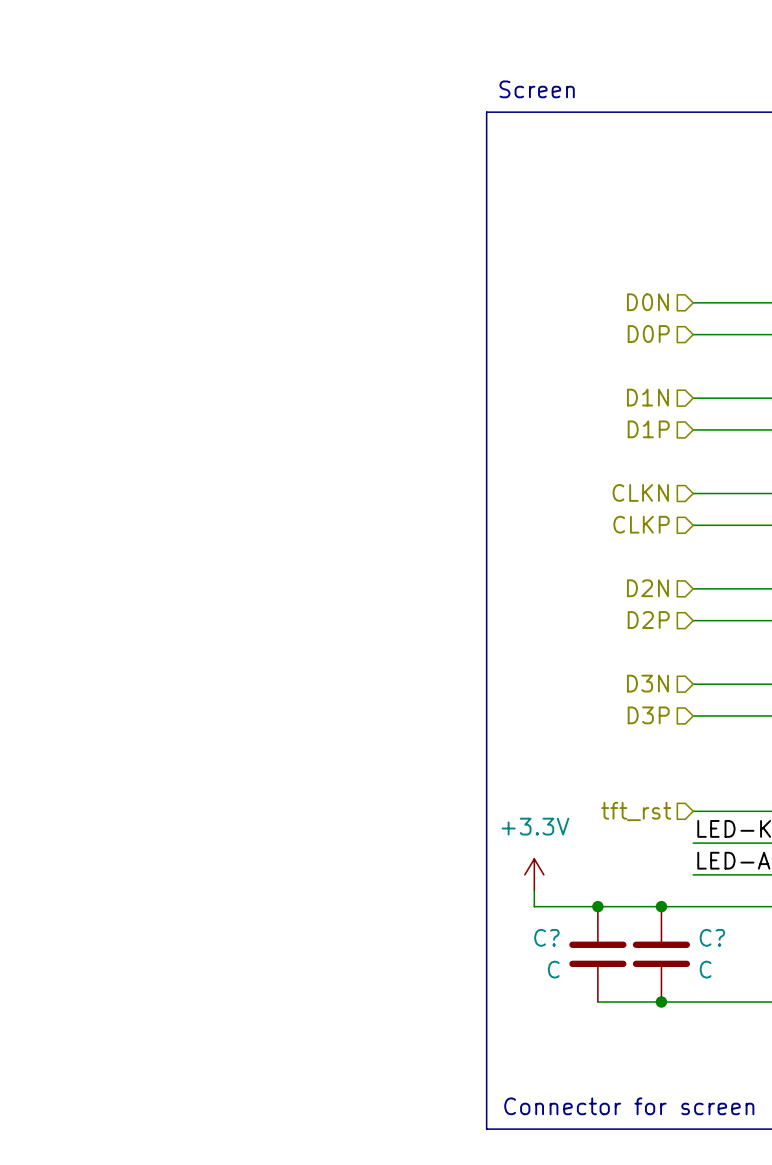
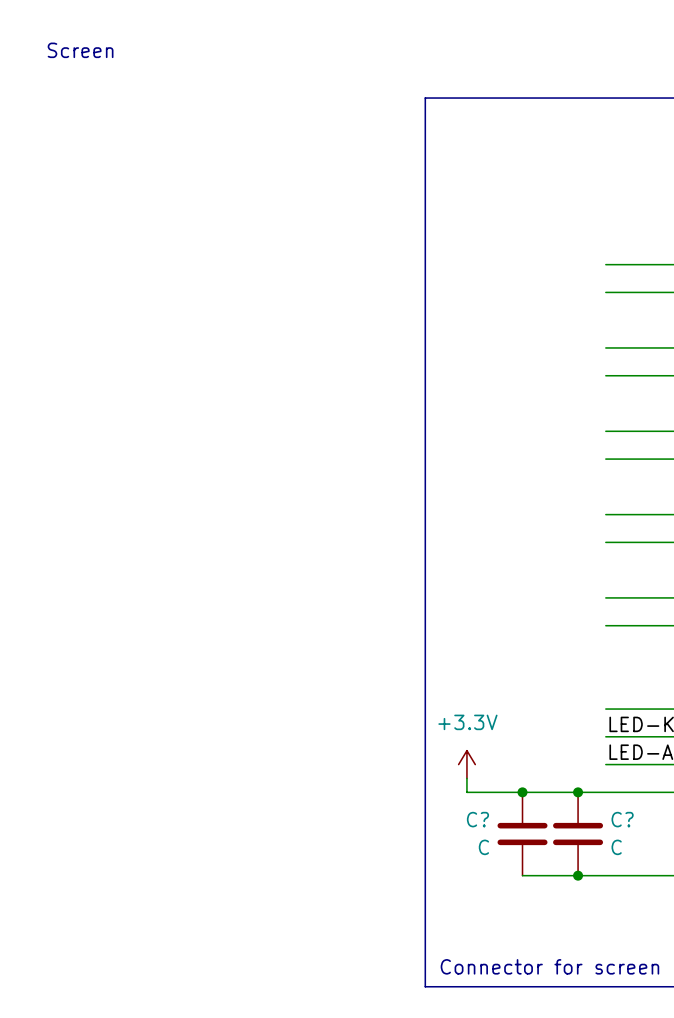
text: none -> Screen (80, 50)
text: Screen (537, 89) -> none
hierarchical label: D0N (647, 302) -> none
hierarchical label: D0P (648, 334) -> none
hierarchical label: D1N (647, 397) -> none
hierarchical label: D1P (648, 429) -> none
hierarchical label: CLKN (640, 492) -> none
hierarchical label: CLKP (641, 524) -> none
hierarchical label: D2N (647, 588) -> none
hierarchical label: D2P (648, 620) -> none
hierarchical label: D3N (647, 683) -> none
hierarchical label: D3P (648, 715) -> none
hierarchical label: tft_rst (636, 811) -> none

